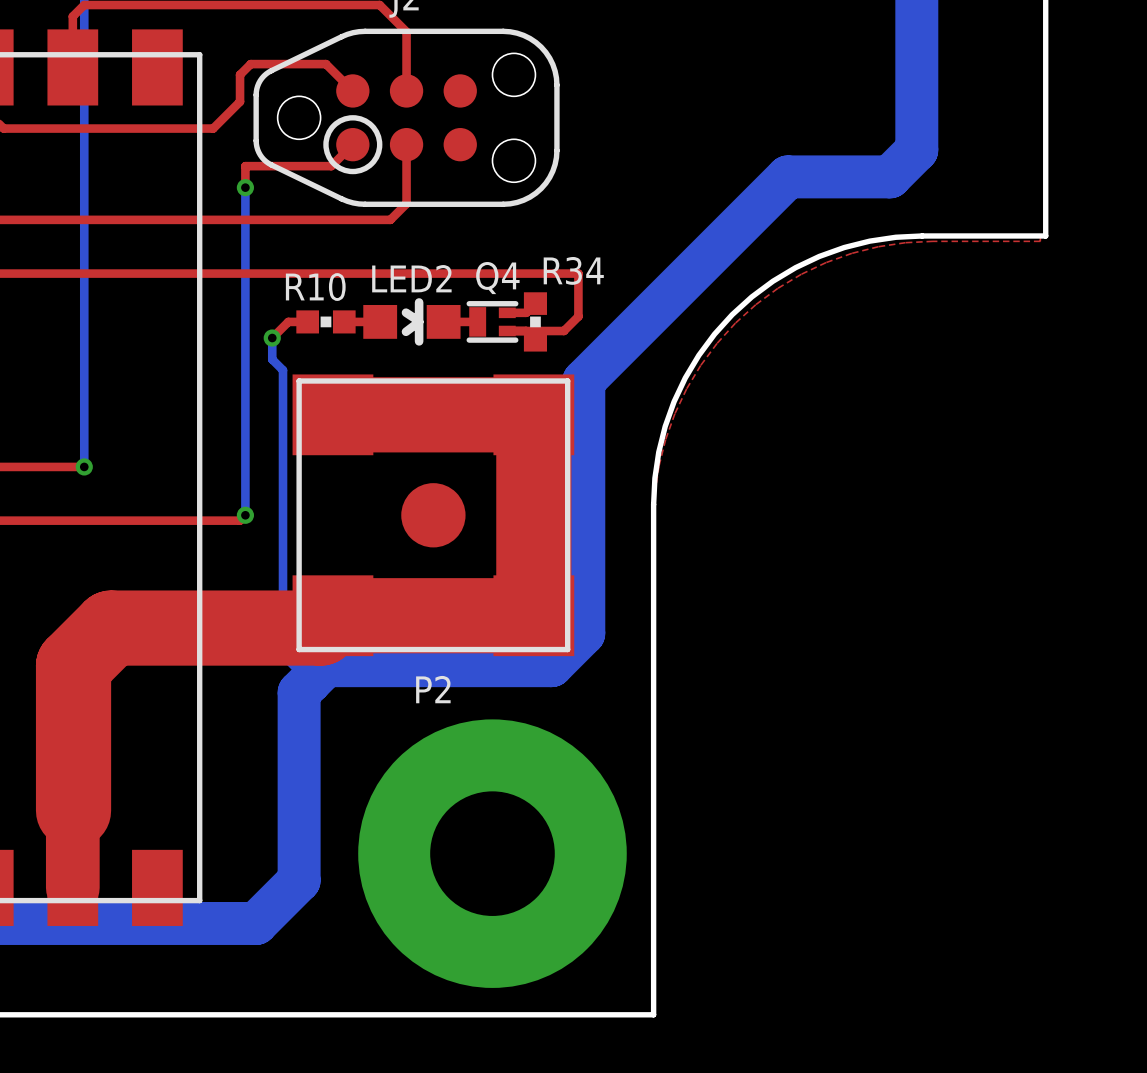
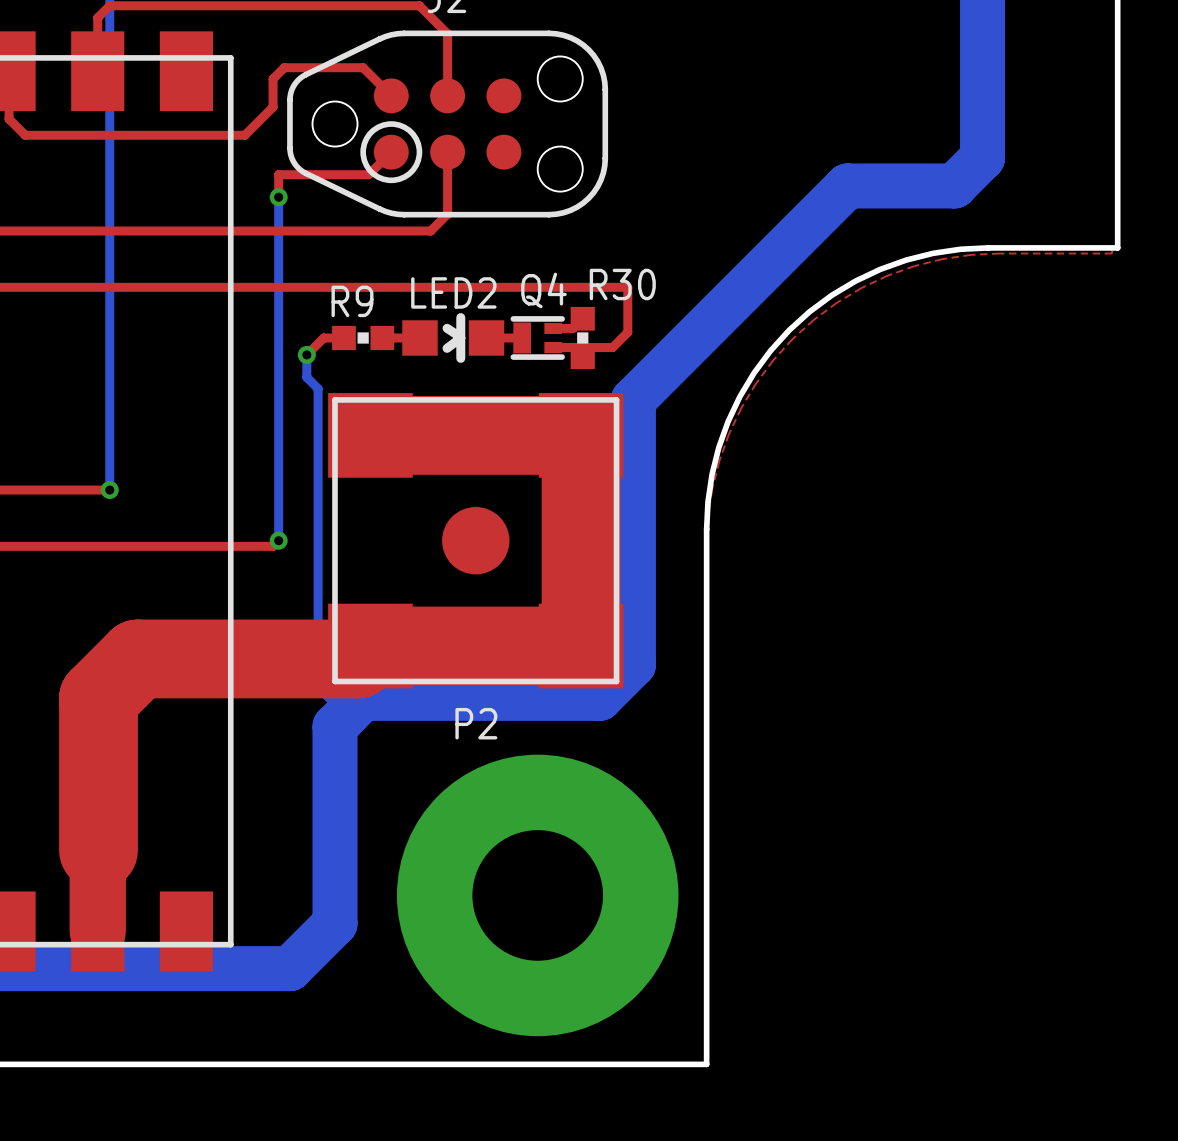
R34 name: R34 (573, 270) -> R30 (622, 284)
R10 name: R10 (315, 287) -> R9 (352, 301)

